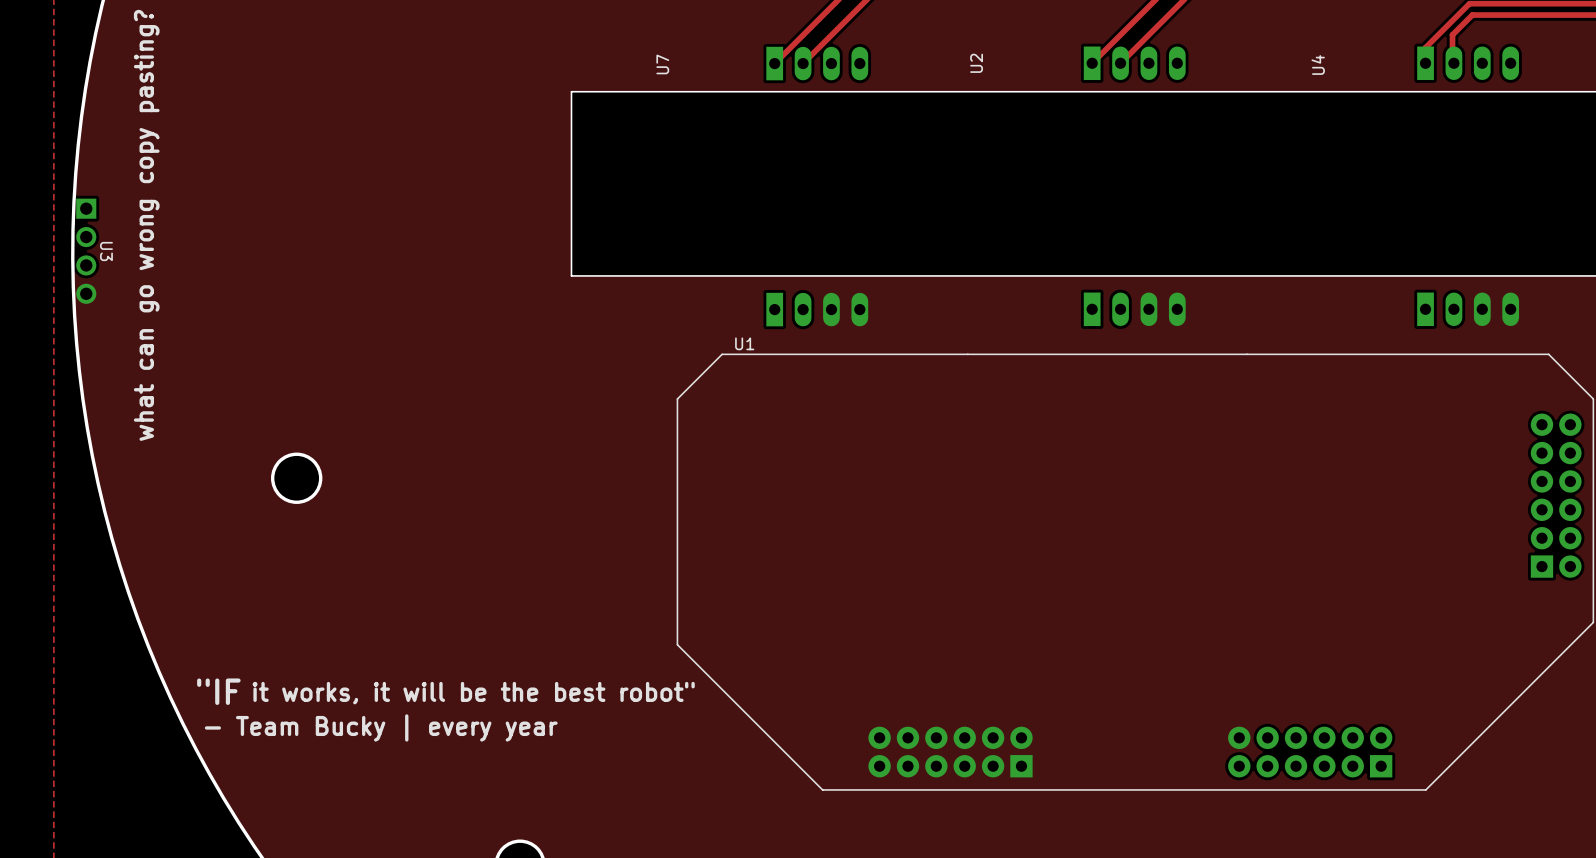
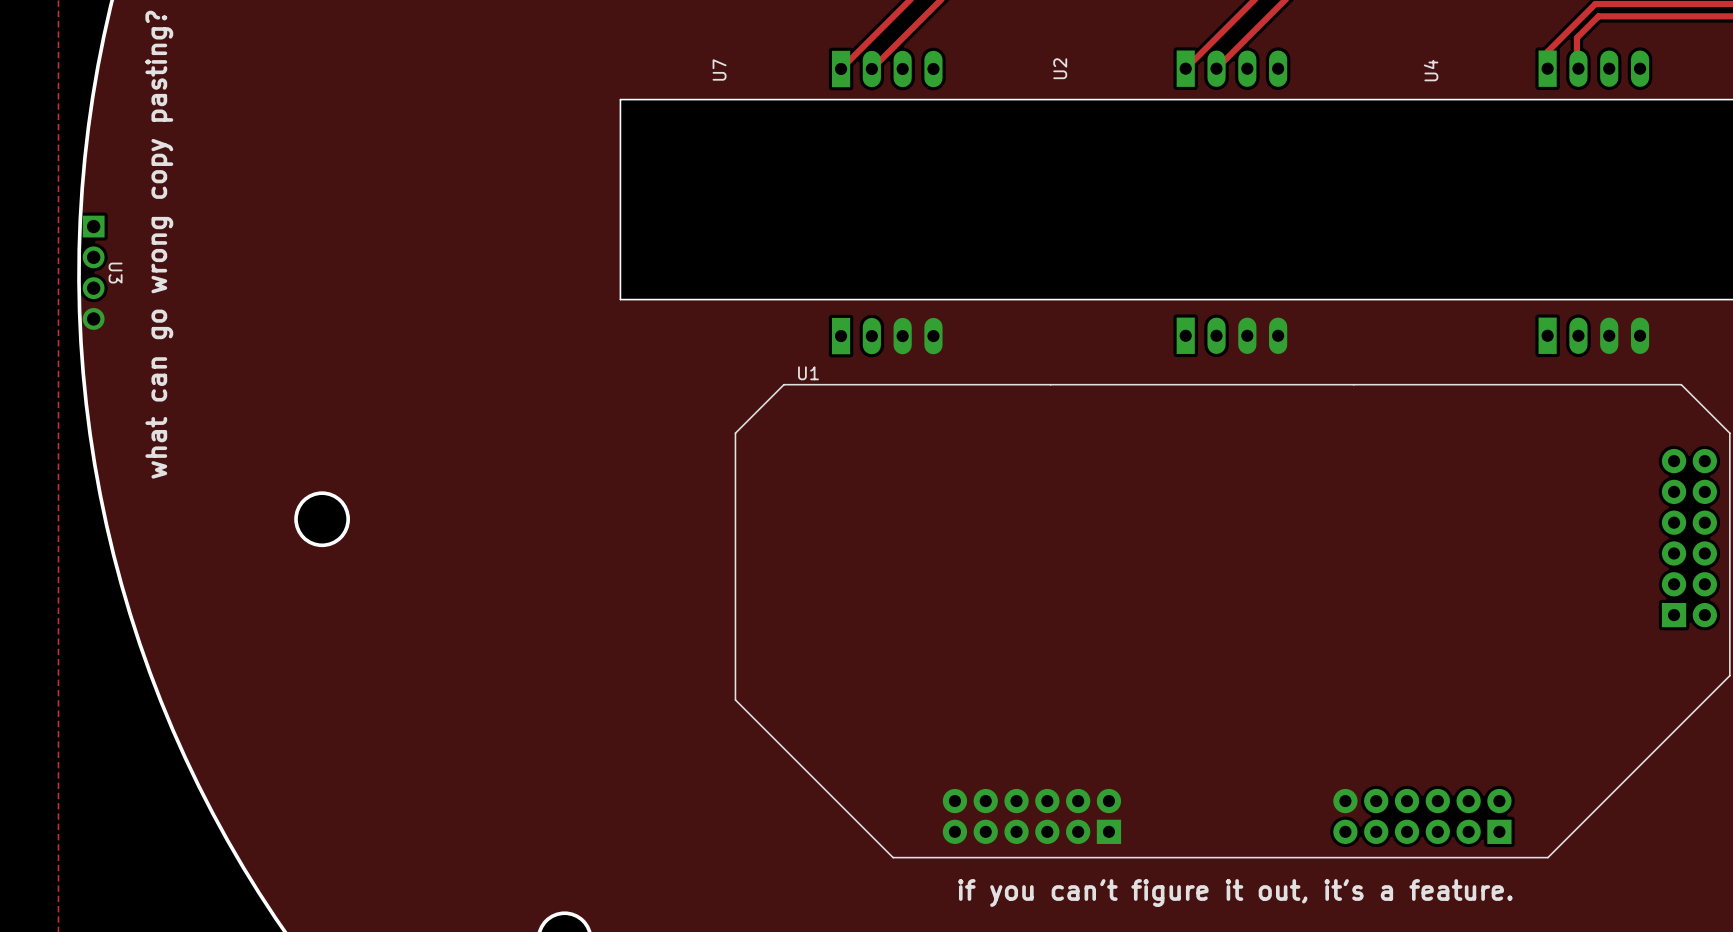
text: "IF (218, 691) -> none
text: it works, it will be the best robot" (473, 693) -> none
text: - Team Bucky | every year (381, 727) -> none
text: none -> if you can't figure it out, it's a feature. (1235, 893)

